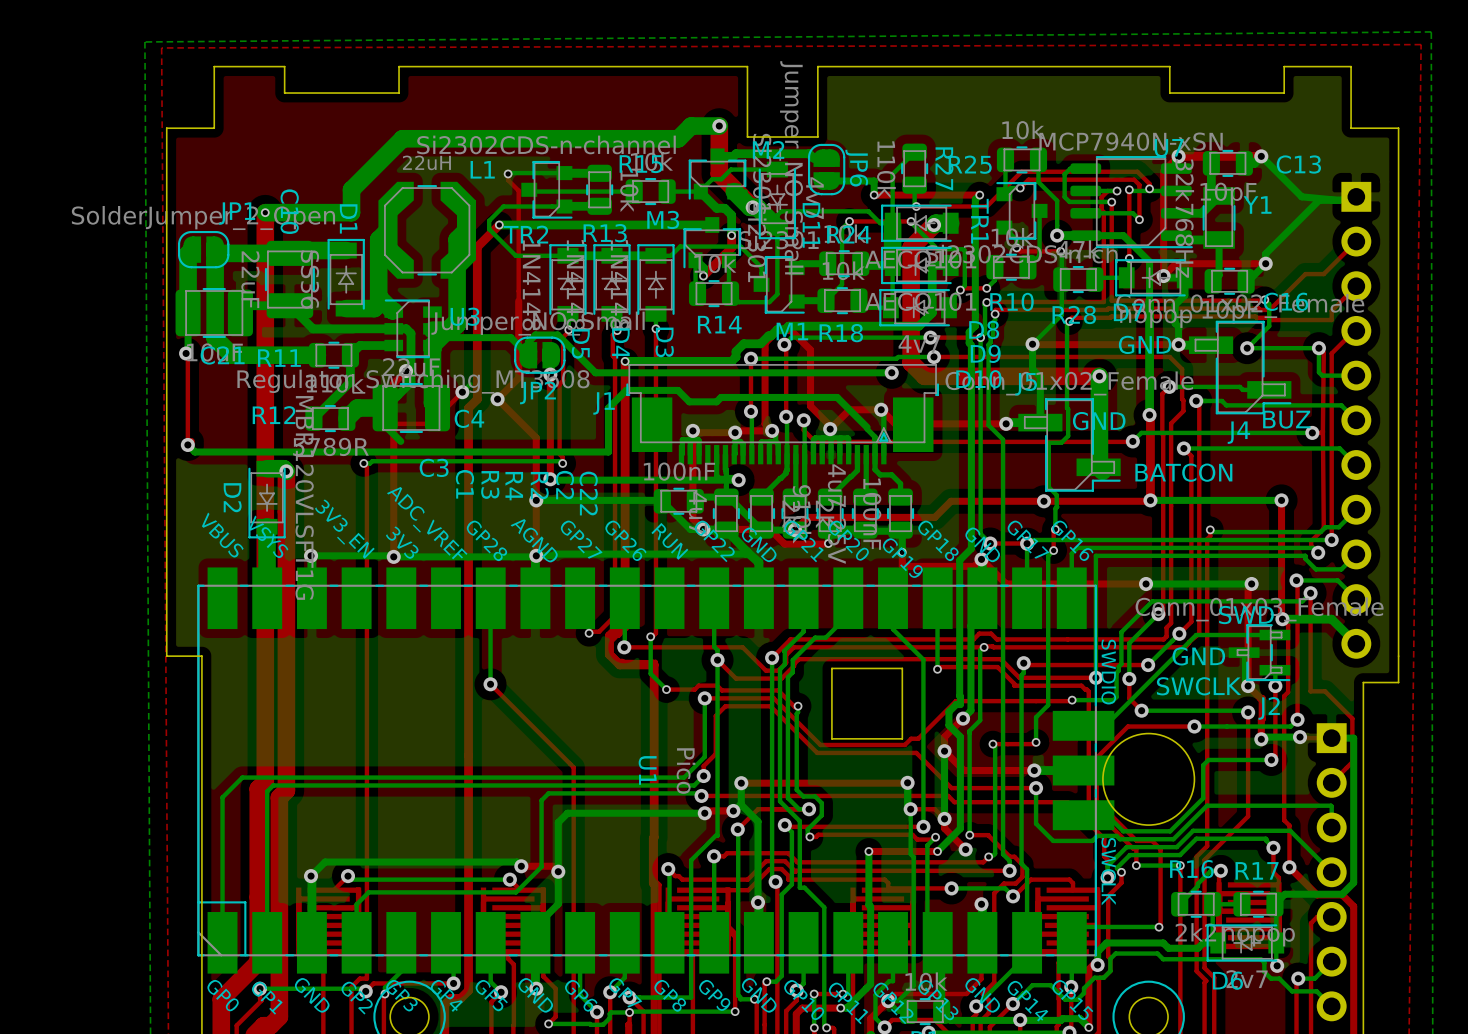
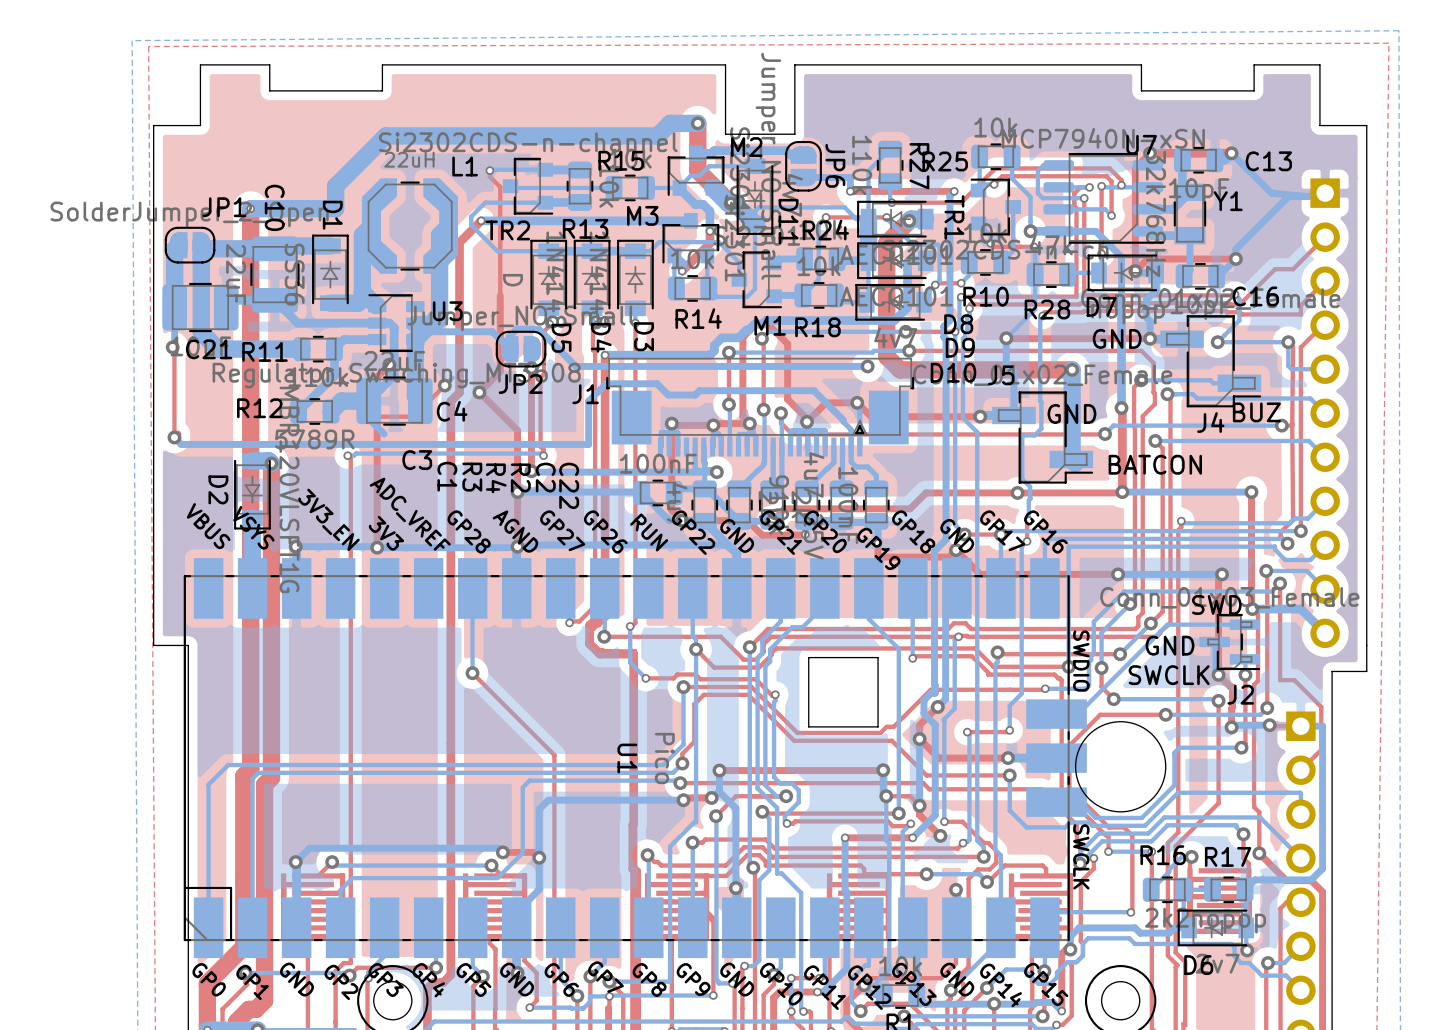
D5 value: 1N4148 (531, 285) -> D (513, 280)

